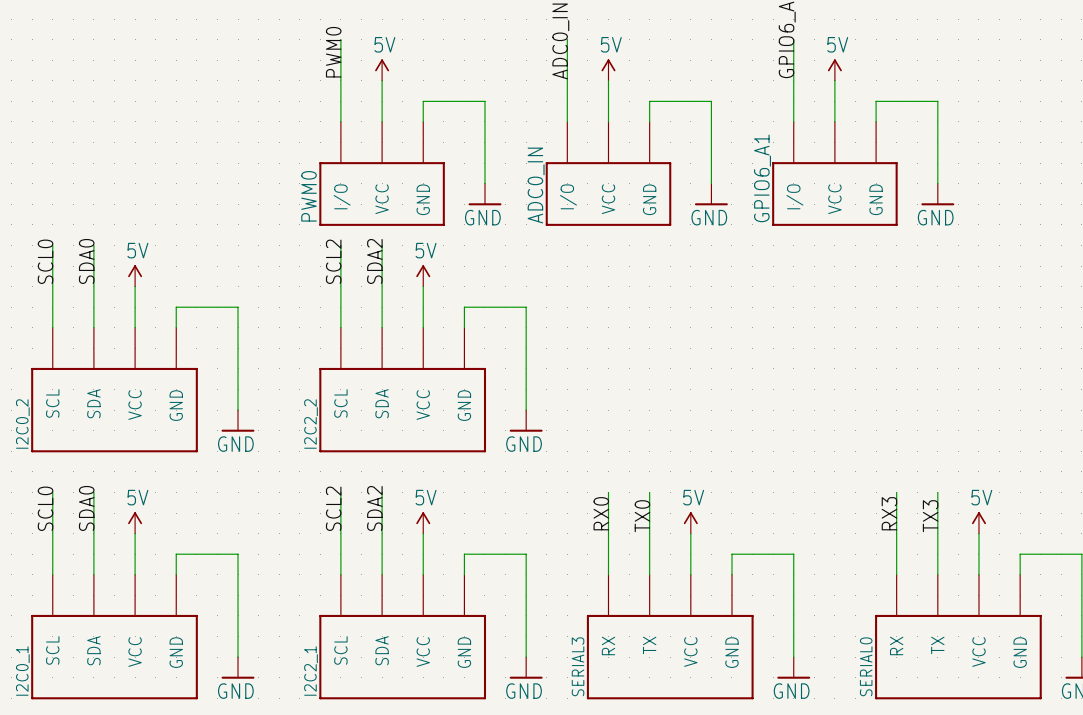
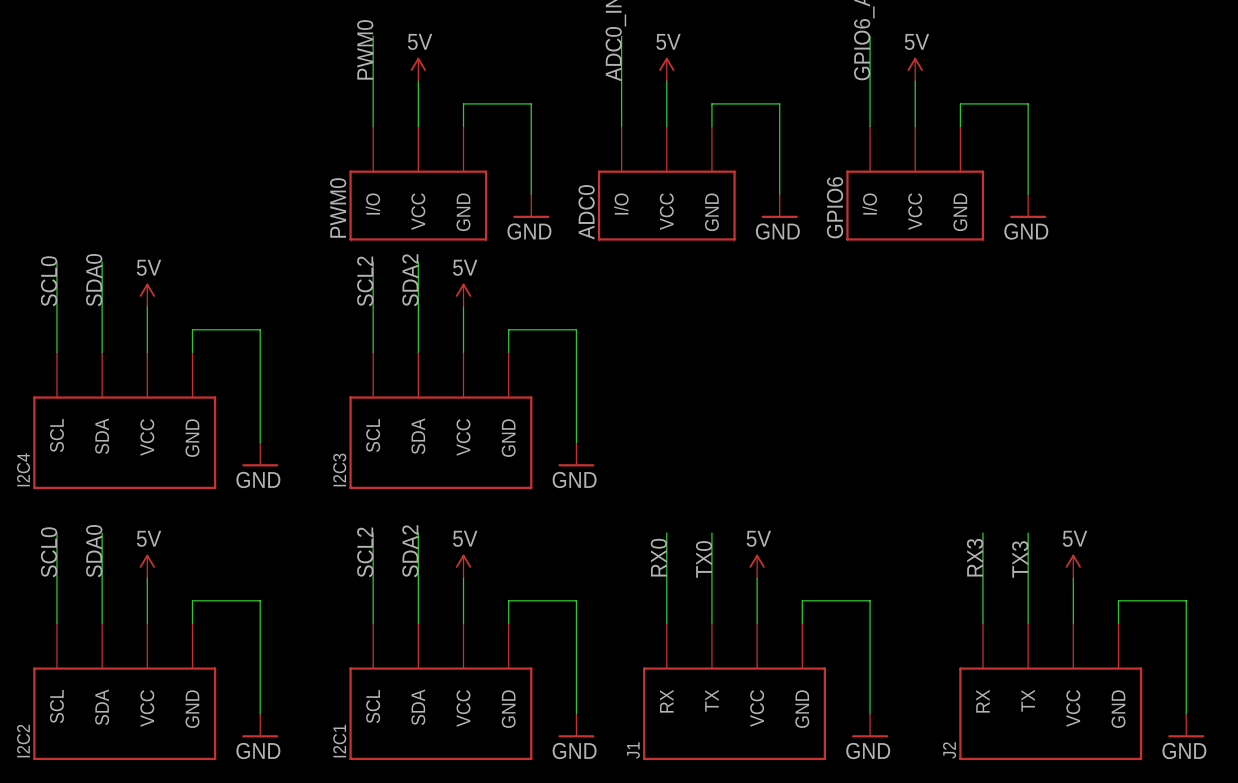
GPIO6_A1 name: GPIO6_A1 (762, 178) -> GPIO6 (835, 207)
ADC0_IN name: ADC0_IN (536, 185) -> ADC0 (586, 212)
I2C0_2 name: I2C0_2 (22, 424) -> I2C4 (23, 469)
I2C2_2 name: I2C2_2 (311, 424) -> I2C3 (339, 470)
SERIAL3 name: SERIAL3 (578, 666) -> J1 (633, 750)
SERIAL0 name: SERIAL0 (866, 666) -> J2 (949, 750)
I2C0_1 name: I2C0_1 (22, 671) -> I2C2 (23, 741)
I2C2_1 name: I2C2_1 (311, 671) -> I2C1 (339, 741)

